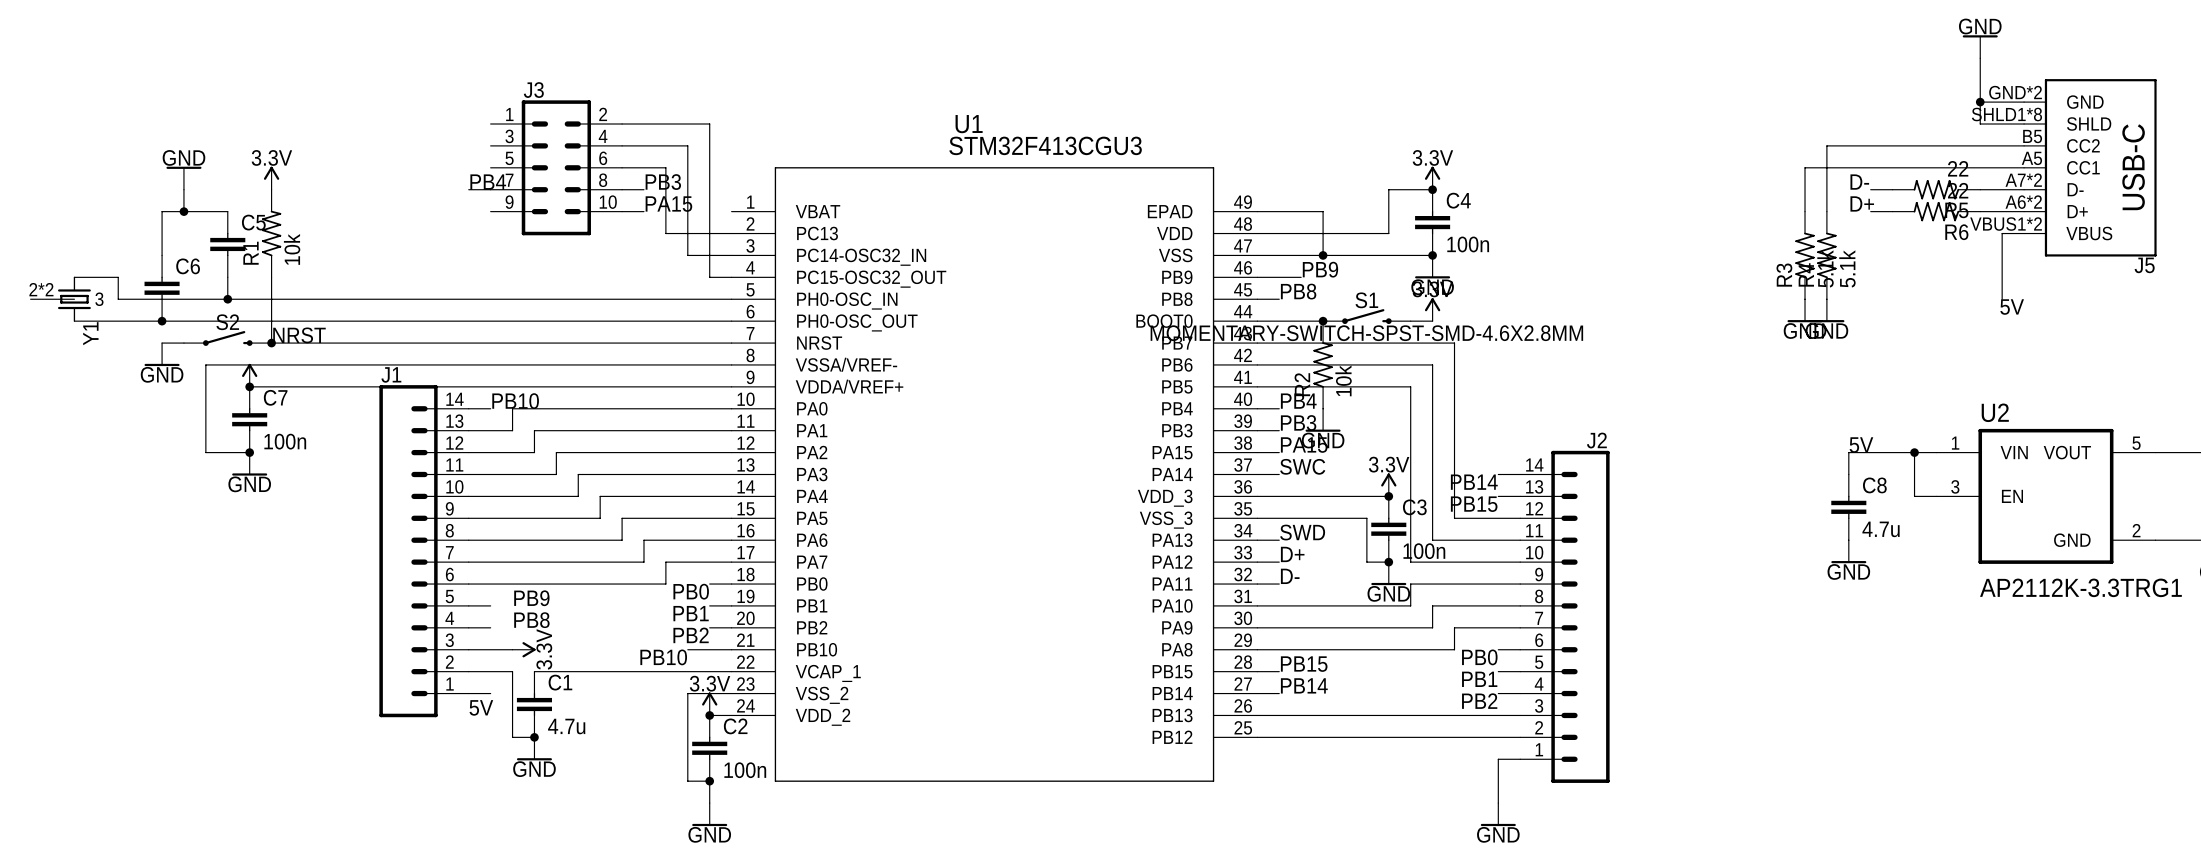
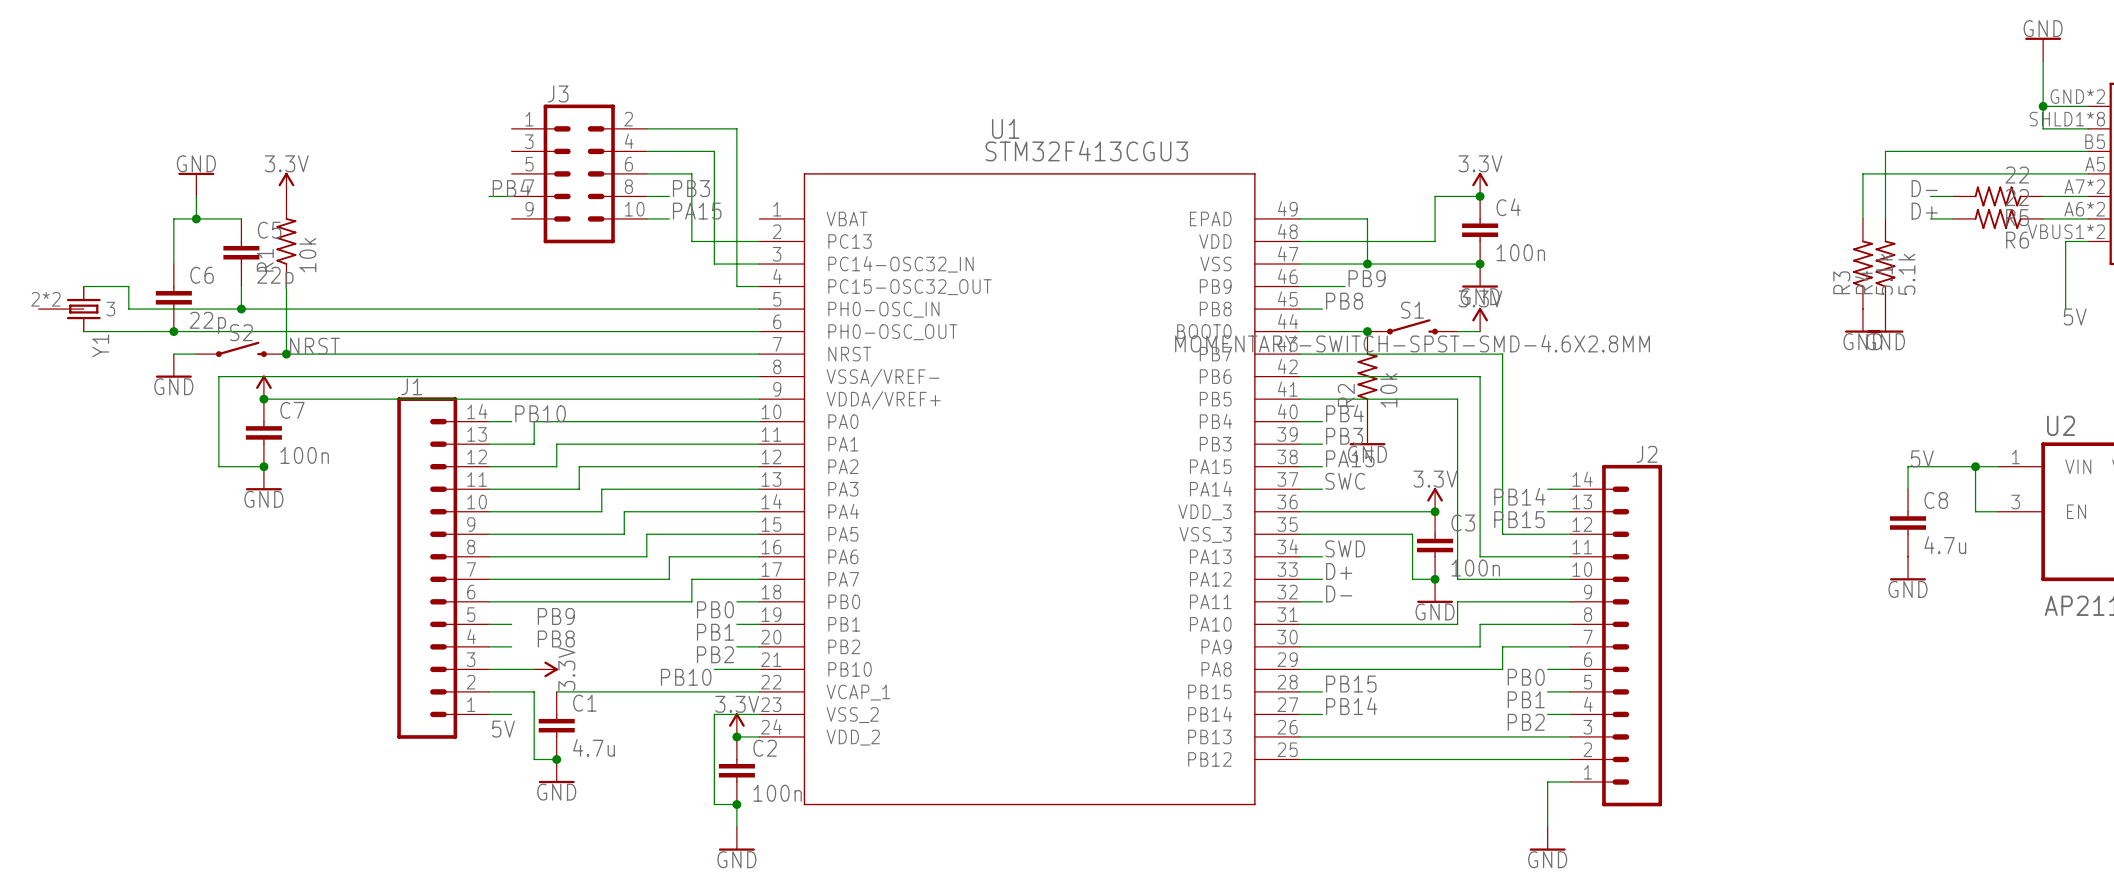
C5 value: none -> 22p (275, 277)
C6 value: none -> 22p (207, 322)

